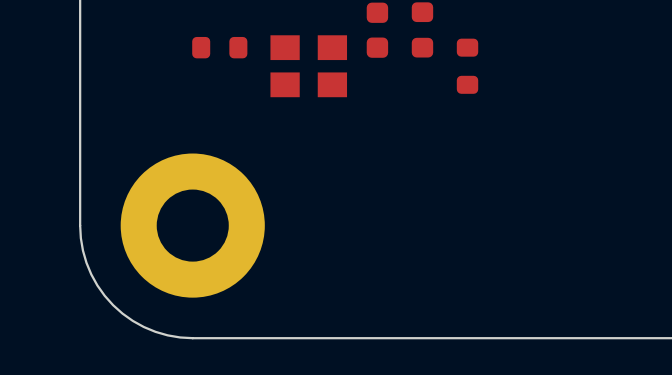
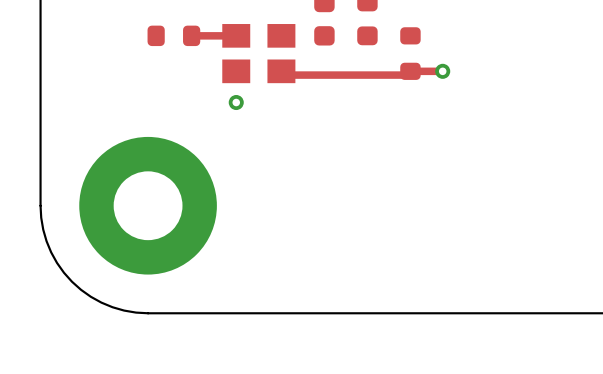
top track: none -> (236, 35) (191, 35)
top track: none -> (442, 71) (410, 71) (406, 75) (285, 75) (281, 71)
via: none -> (442, 71)
via: none -> (236, 102)

